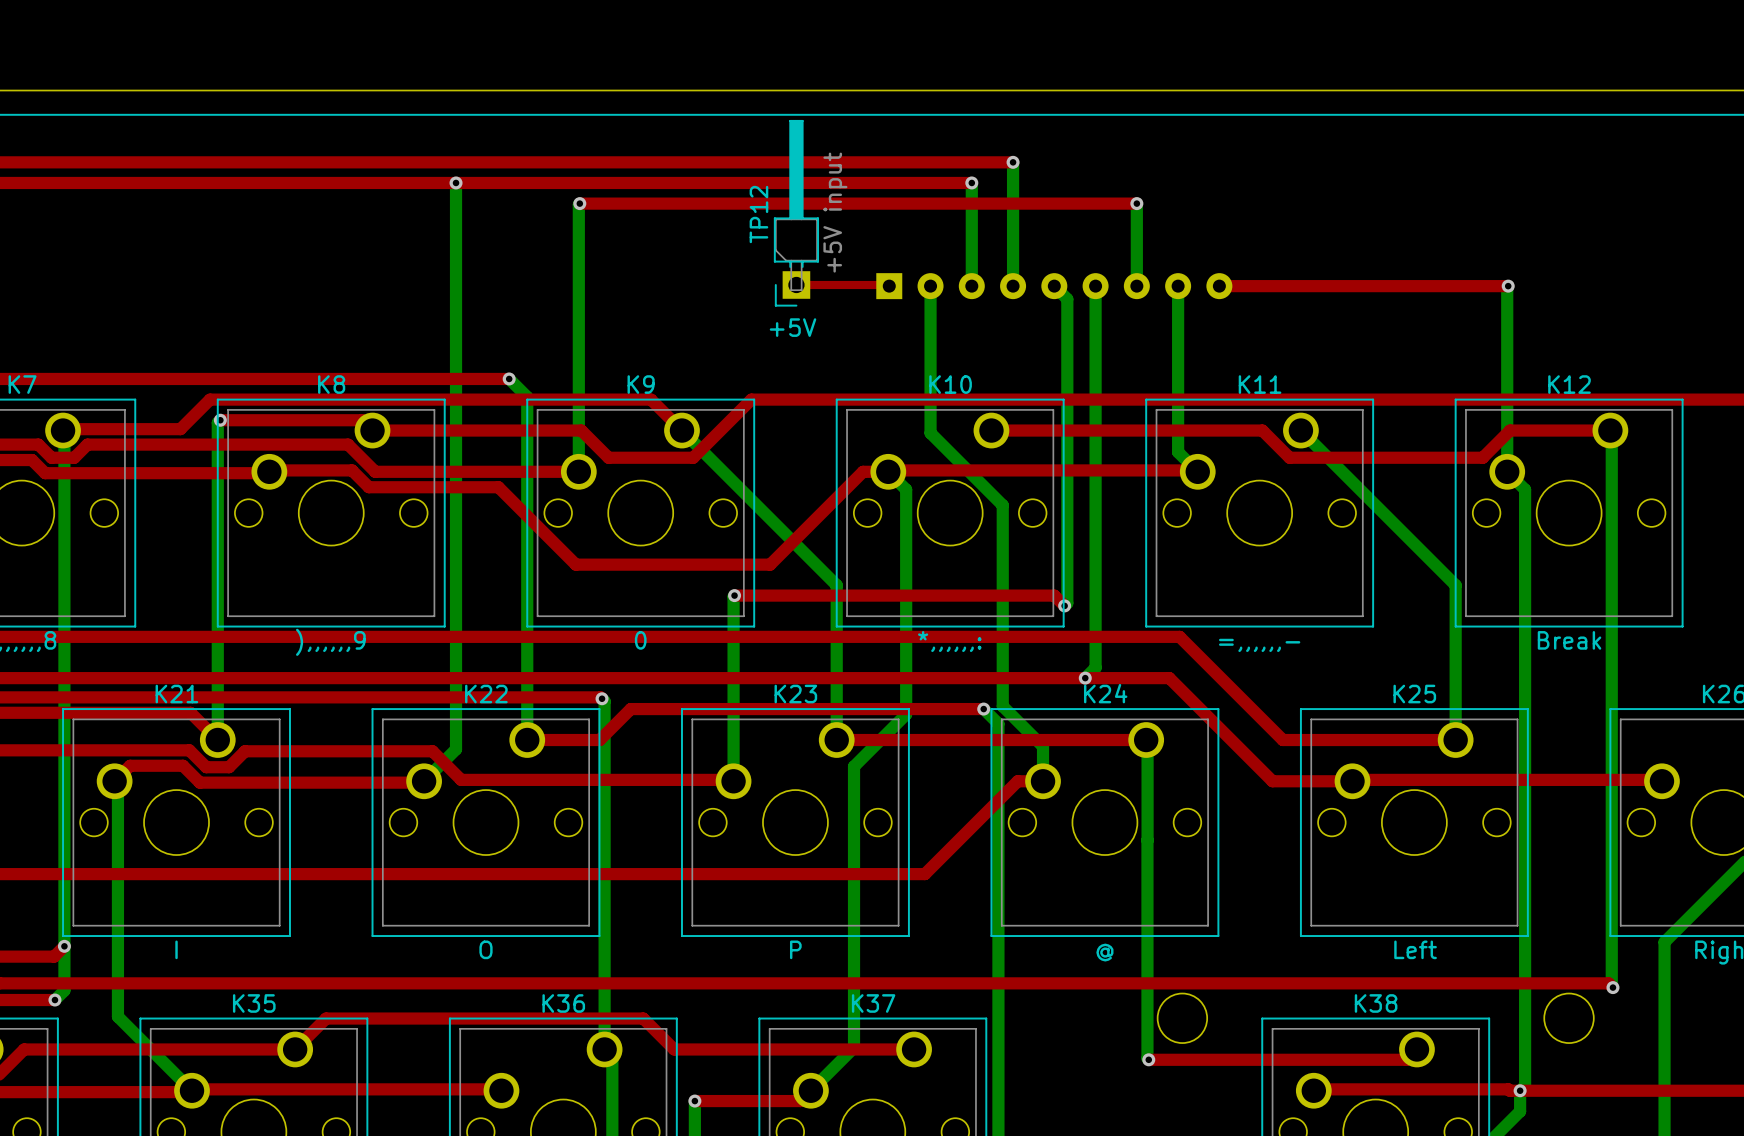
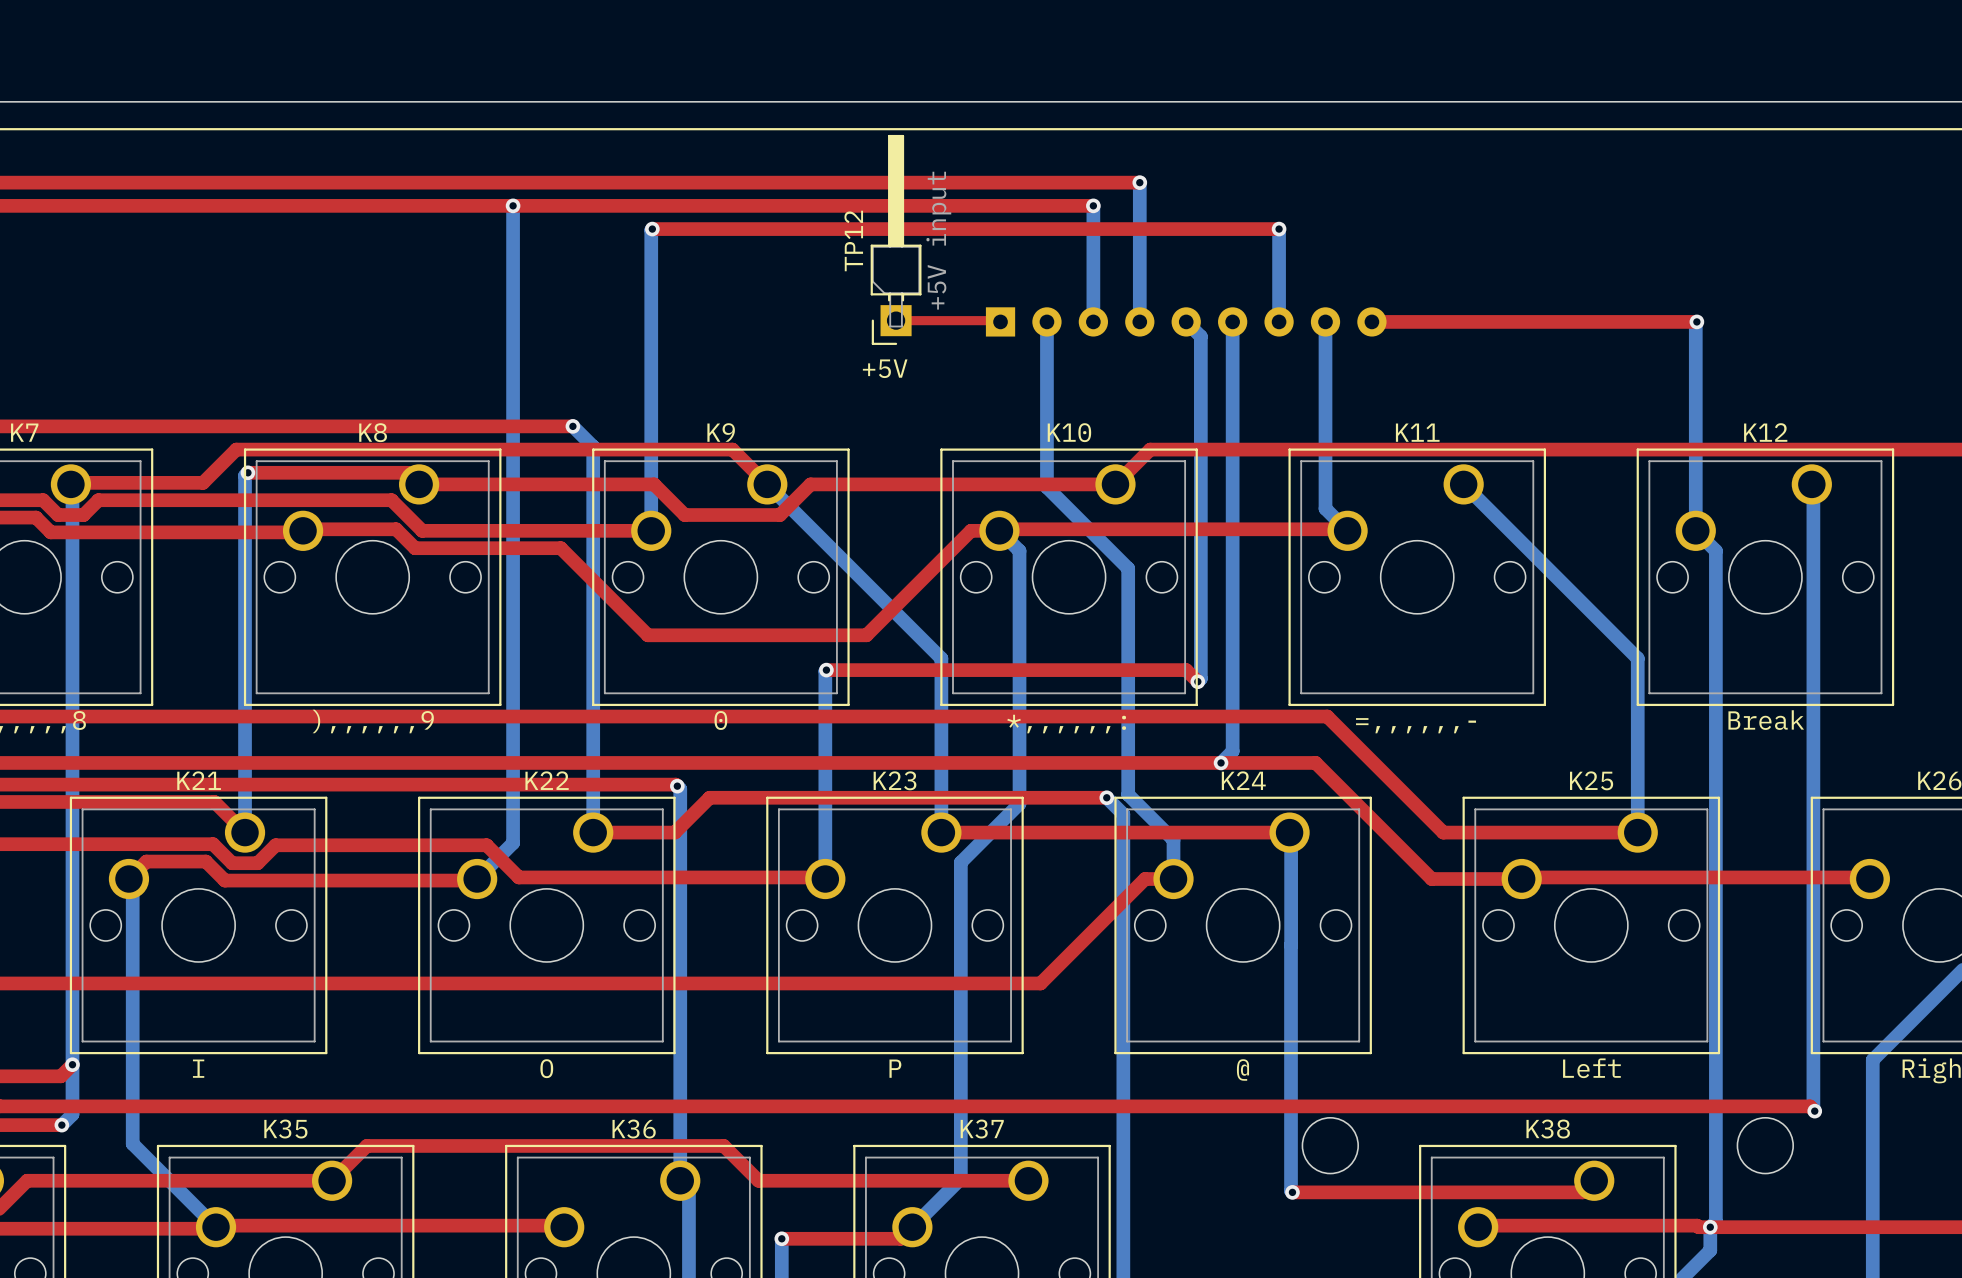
top track: (1022, 399) (751, 399) (720, 430) -> (1150, 449) (1115, 484) (810, 484)
top track: (991, 430) (1262, 430) (1289, 457) (1482, 457) (1510, 430) (1610, 430) -> none

